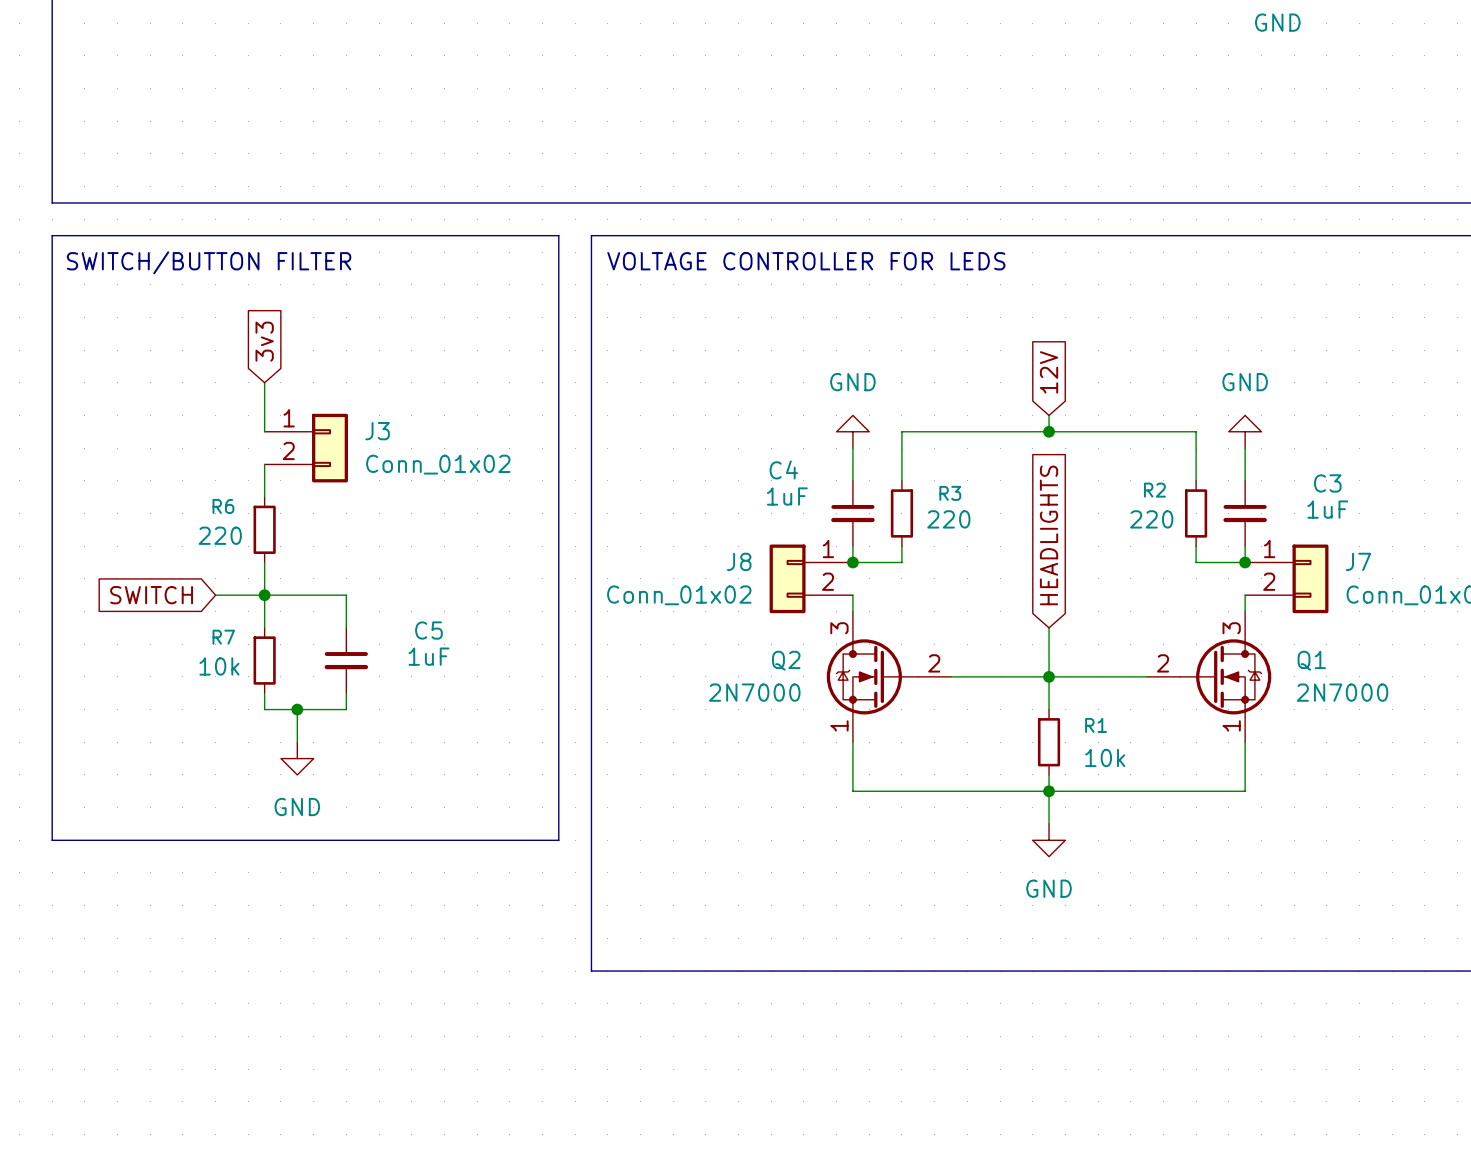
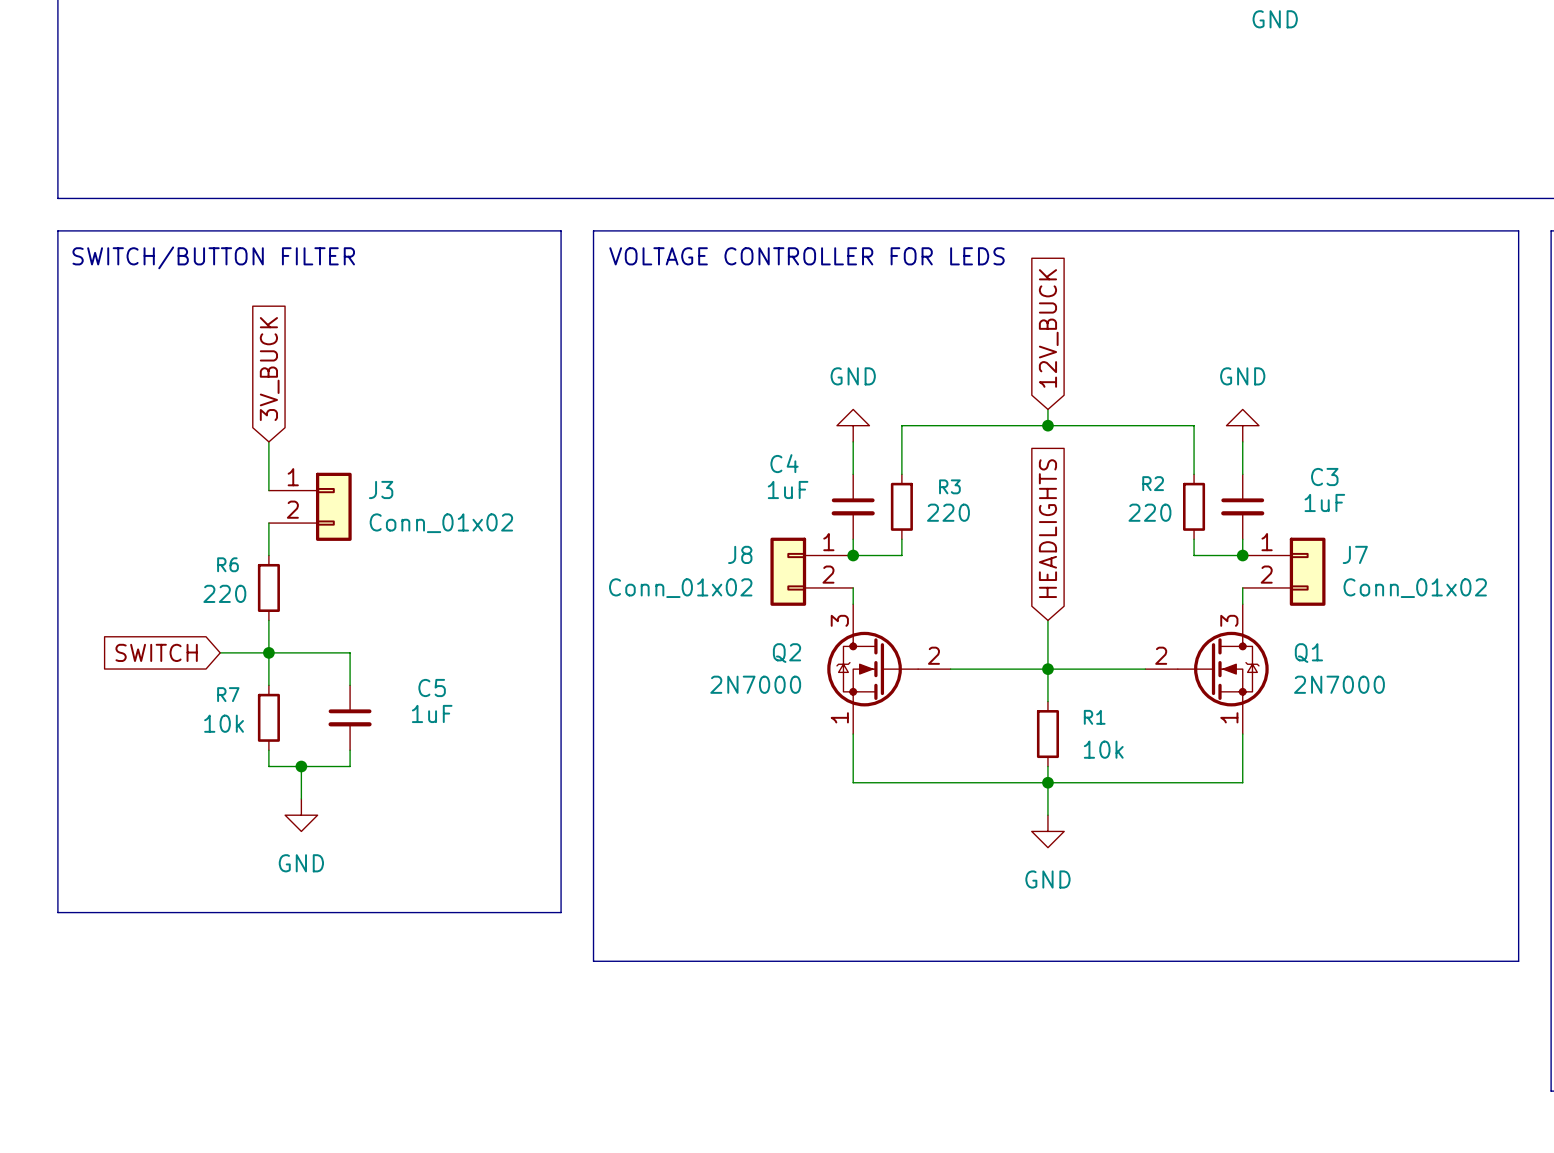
global label: 3v3 (264, 341) -> none
global label: 12V (1049, 372) -> 12V_BUCK (1048, 328)
global label: none -> 3V_BUCK (269, 369)
wire: (264, 382) (264, 431) -> none
wire: none -> (268, 441) (268, 458)
J3 position: (306, 448) -> (310, 506)
R6 position: (264, 529) -> (268, 587)
wire: (264, 562) (264, 627) -> (268, 555) (268, 523)
global label position: SWITCH (151, 595) -> SWITCH (156, 652)
wire: (215, 595) (346, 595) (346, 627) -> none
junction: (264, 595) -> none
wire: none -> (268, 620) (268, 685)
junction: none -> (268, 652)
R7 position: (264, 660) -> (268, 717)
C5 position: (346, 660) -> (350, 717)
wire: (264, 693) (264, 709) (346, 709) (346, 693) -> (220, 652) (350, 652) (350, 685)
wire: (297, 709) (297, 742) -> (301, 766) (301, 798)
junction: (297, 709) -> none
wire: none -> (268, 750) (268, 766) (350, 766) (350, 750)
power symbol position: GND (297, 758) -> GND (301, 815)
junction: none -> (301, 766)
line: (52, 840) (558, 840) -> (57, 831) (57, 912) (561, 912) (561, 831)

